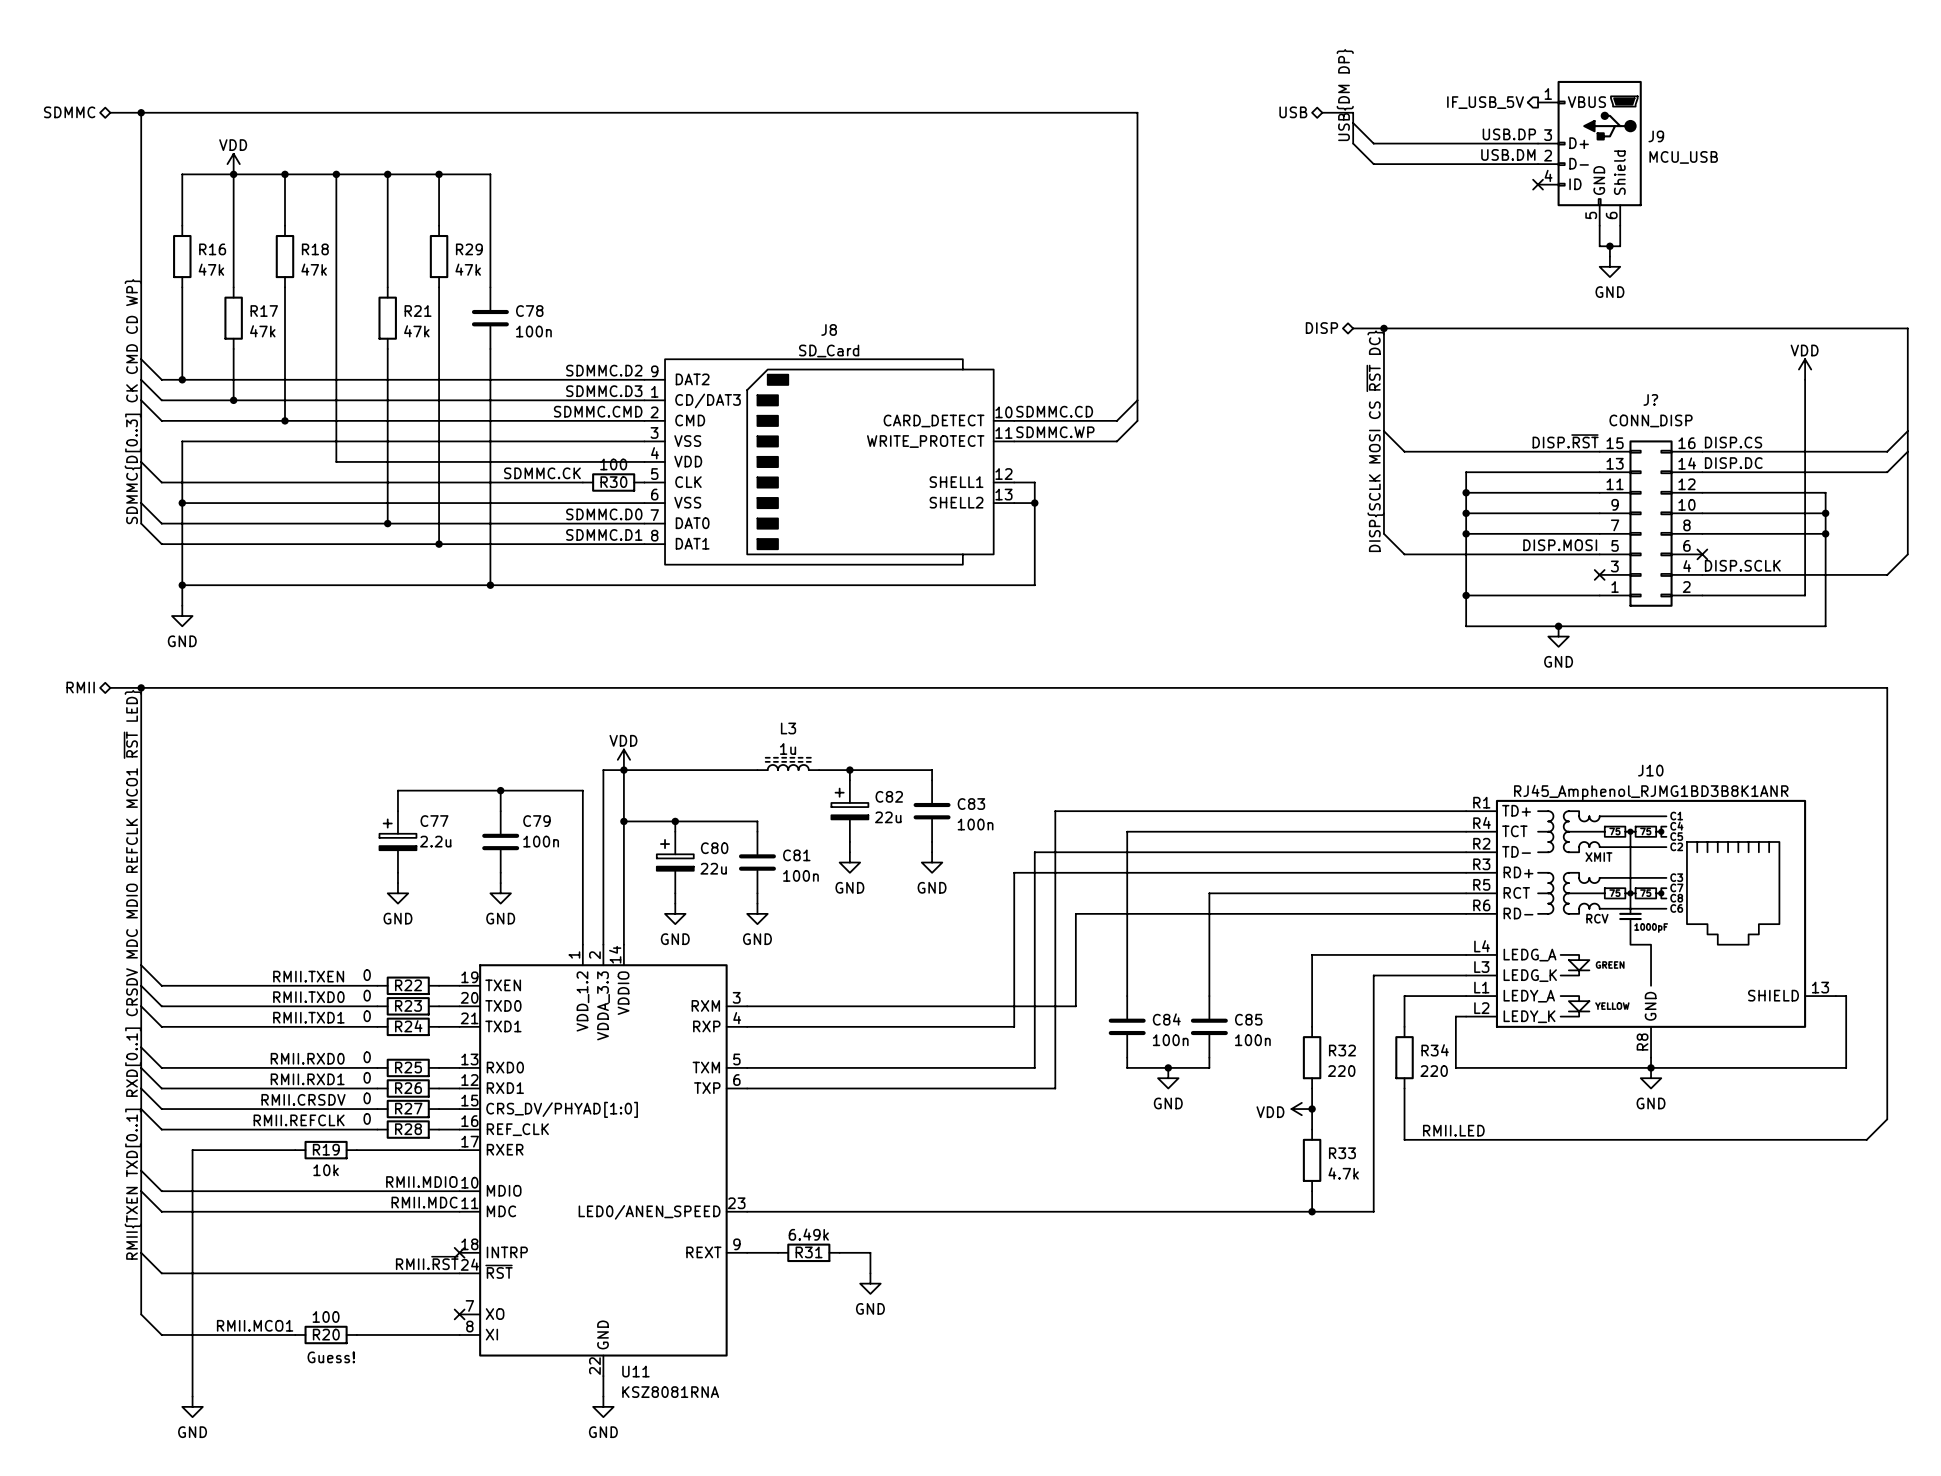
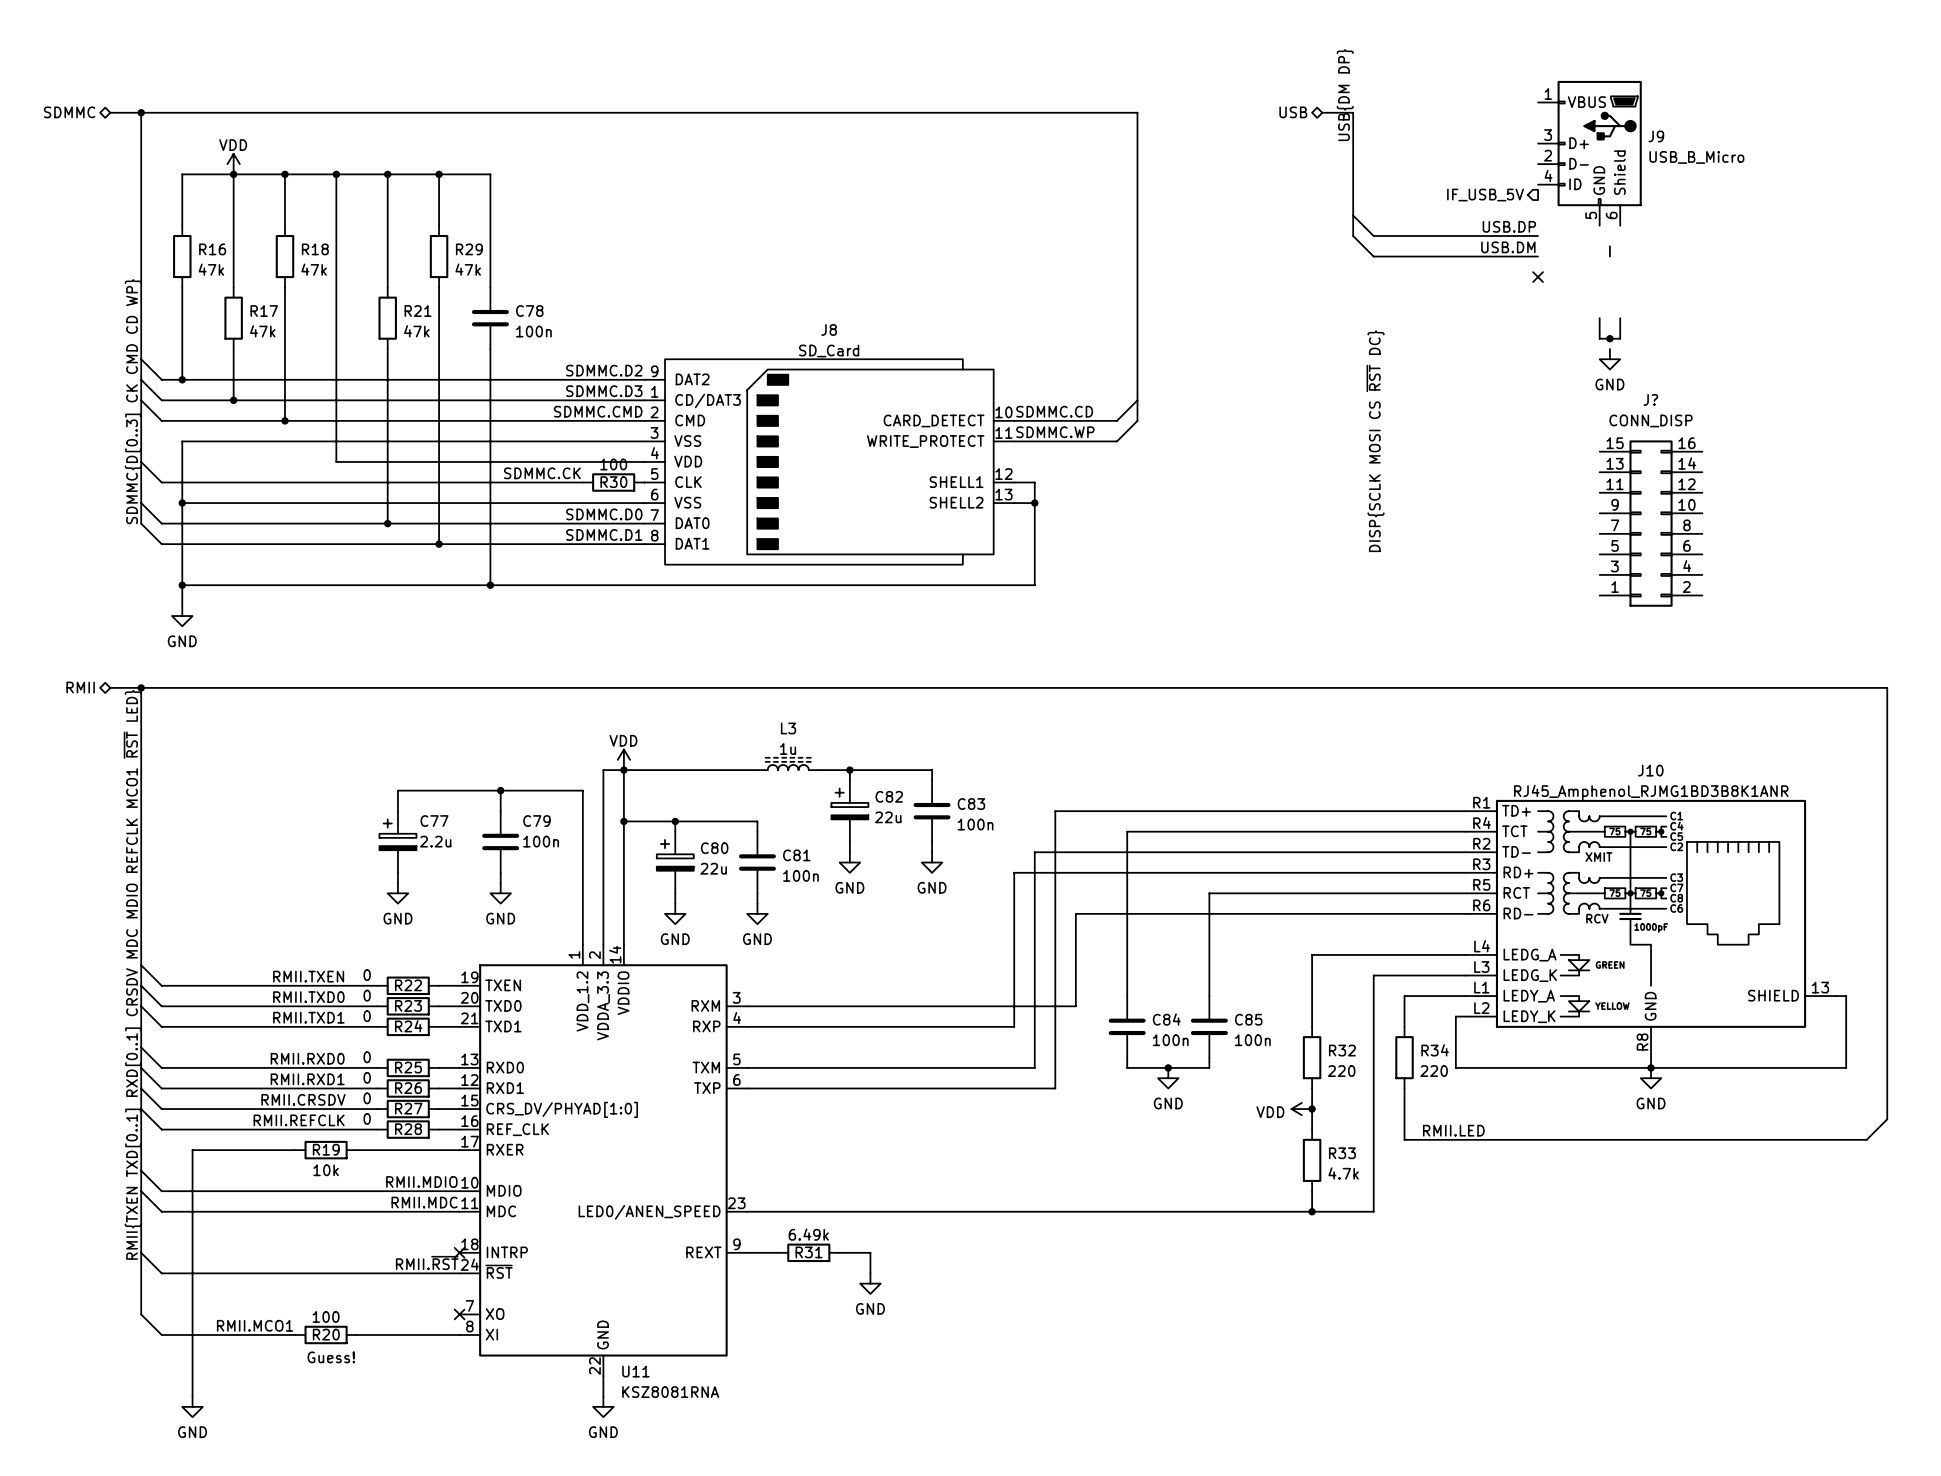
hierarchical label position: IF_USB_5V (1485, 102) -> IF_USB_5V (1485, 195)
wire: (1353, 123) (1373, 143) (1538, 143) -> (1353, 215) (1373, 236) (1538, 236)
label position: USB.DP (1509, 134) -> USB.DP (1509, 226)
wire: (1353, 143) (1373, 164) (1538, 164) -> (1353, 236) (1373, 256) (1538, 256)
bus: none -> (1353, 143) (1353, 236)
label position: USB.DM (1508, 154) -> USB.DM (1508, 247)
J9 value: MCU_USB (1683, 157) -> USB_B_Micro (1696, 157)
no-connect mark: (1538, 184) -> none
wire: (1599, 225) (1599, 246) (1620, 246) (1620, 225) -> (1599, 318) (1599, 338) (1620, 338) (1620, 318)
junction: (1609, 246) -> none
power symbol position: GND (1609, 266) -> GND (1609, 359)
no-connect mark: none -> (1538, 277)
hierarchical label: DISP (1321, 328) -> none
bus: (1353, 328) (1907, 328) (1907, 554) -> none
bus: (1383, 328) (1383, 533) -> none
junction: (1383, 328) -> none
junction: none -> (1609, 338)
power symbol: VDD (1805, 369) -> none
wire: (1805, 379) (1805, 595) (1702, 595) -> none
wire: (1383, 431) (1404, 451) (1599, 451) -> none
wire: (1907, 431) (1887, 451) (1702, 451) -> none
label: DISP.~{RST} (1565, 441) -> none
label: DISP.CS (1733, 442) -> none
wire: (1907, 451) (1887, 472) (1702, 472) -> none
label: DISP.DC (1733, 463) -> none
wire: (1599, 472) (1466, 472) (1466, 626) (1825, 626) (1825, 492) (1702, 492) -> none
wire: (1466, 492) (1599, 492) -> none
junction: (1466, 492) -> none
wire: (1466, 513) (1599, 513) -> none
junction: (1466, 513) -> none
wire: (1702, 513) (1825, 513) -> none
junction: (1825, 513) -> none
wire: (1383, 533) (1404, 554) (1599, 554) -> none
wire: (1466, 533) (1599, 533) -> none
junction: (1466, 533) -> none
wire: (1702, 533) (1825, 533) -> none
junction: (1825, 533) -> none
label: DISP.MOSI (1560, 545) -> none
no-connect mark: (1702, 554) -> none
wire: (1907, 554) (1887, 574) (1702, 574) -> none
label: DISP.SCLK (1742, 565) -> none
no-connect mark: (1599, 574) -> none
wire: (1466, 595) (1599, 595) -> none
junction: (1466, 595) -> none
junction: (1558, 626) -> none
power symbol: GND (1558, 636) -> none

